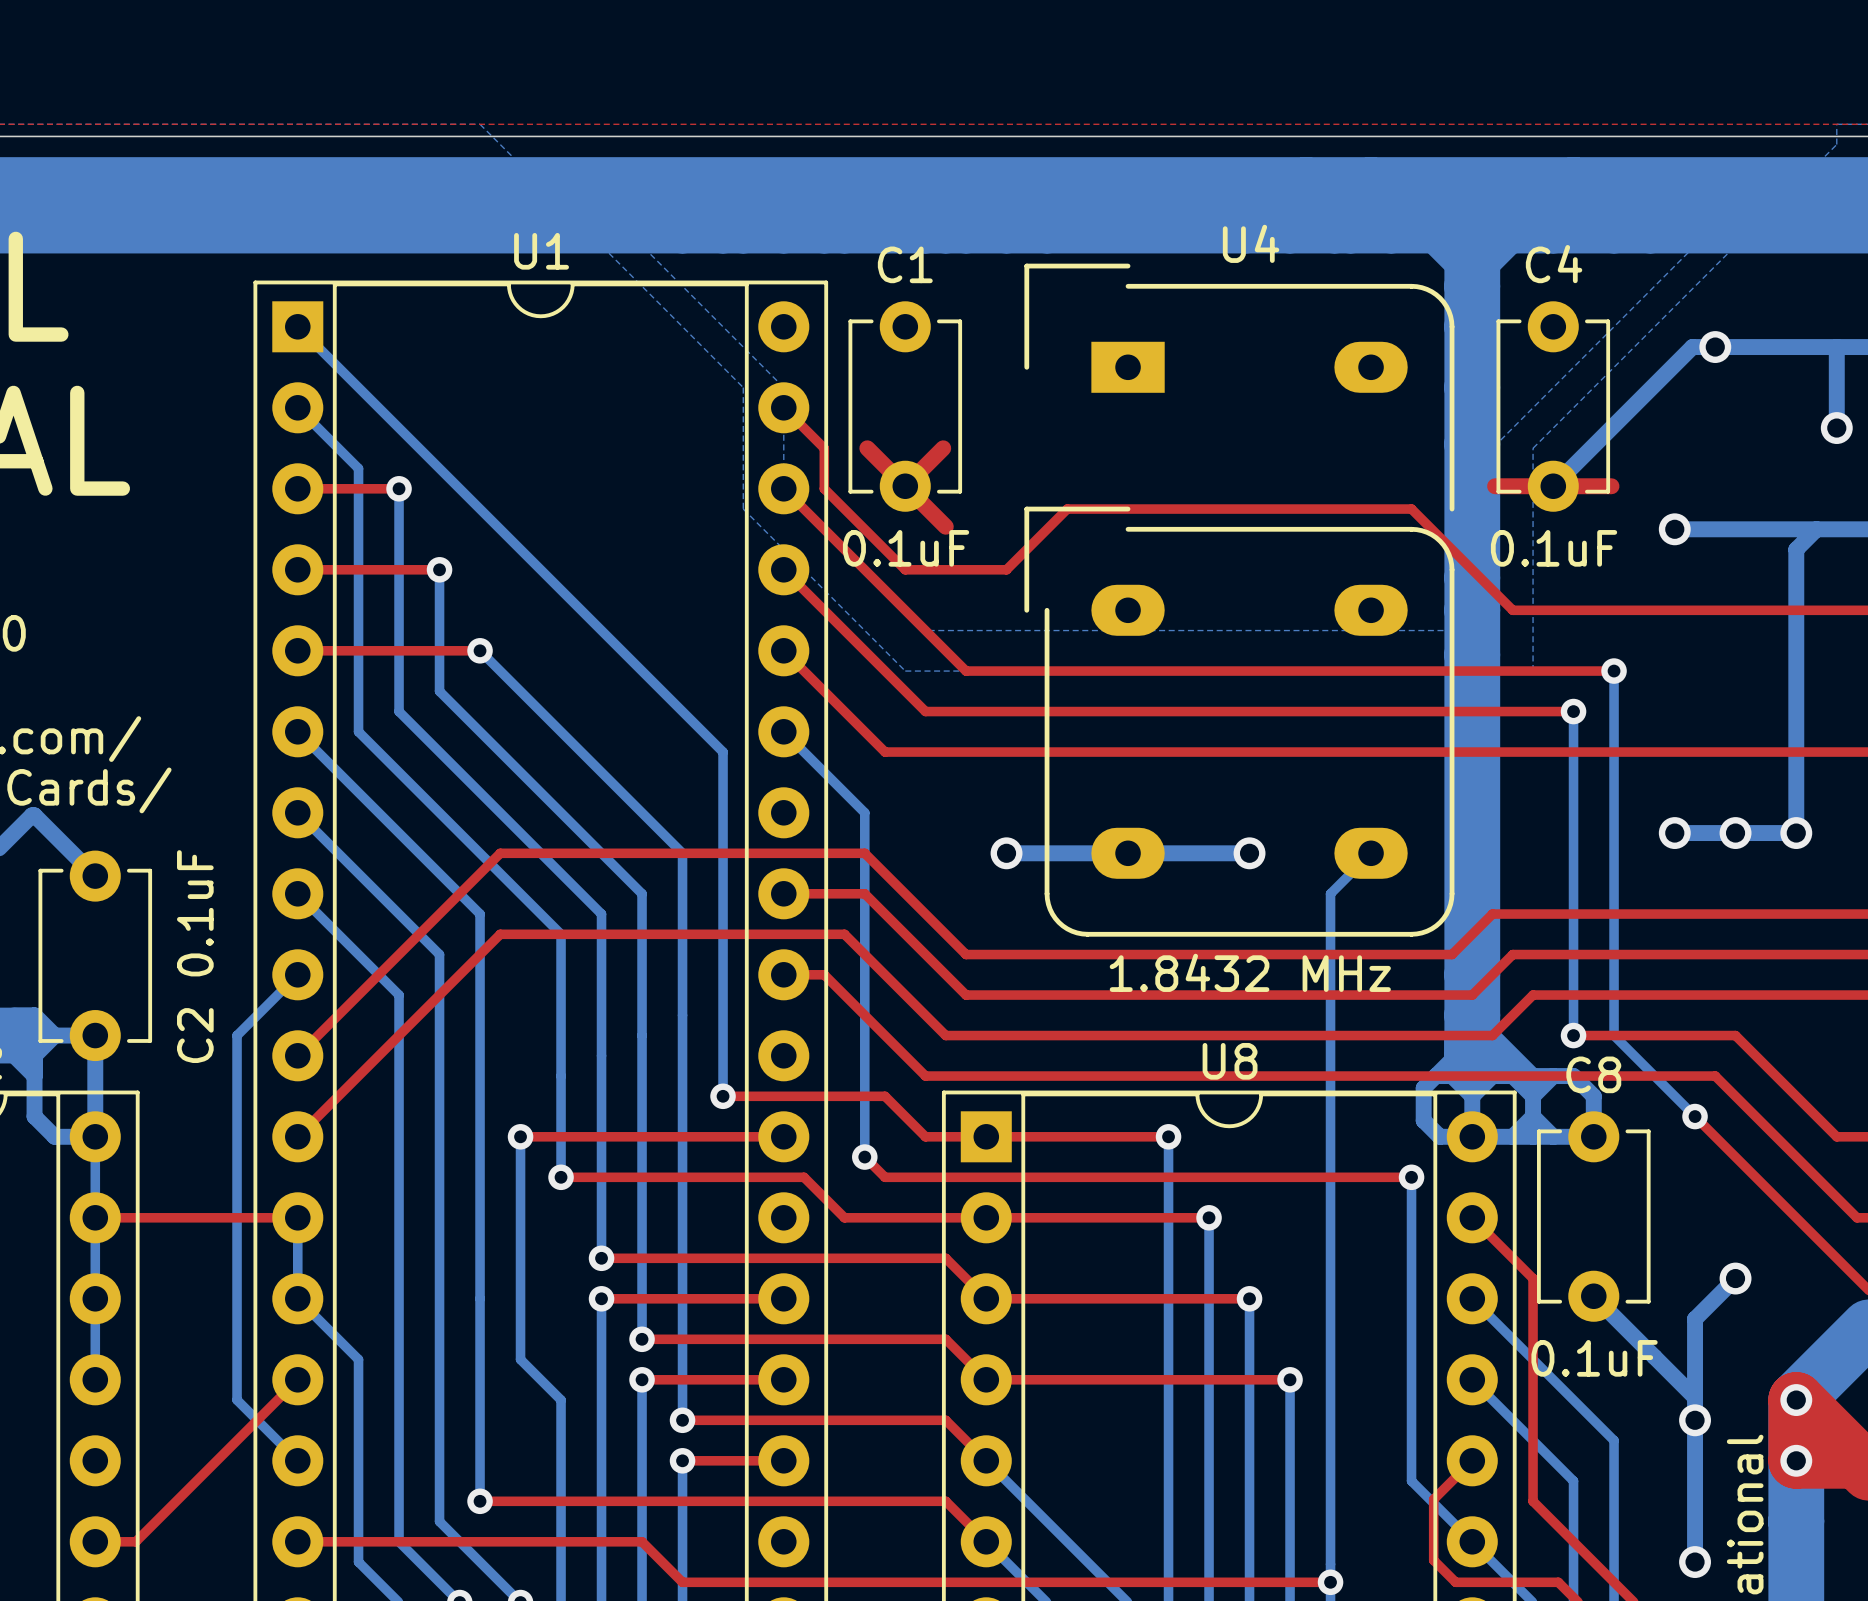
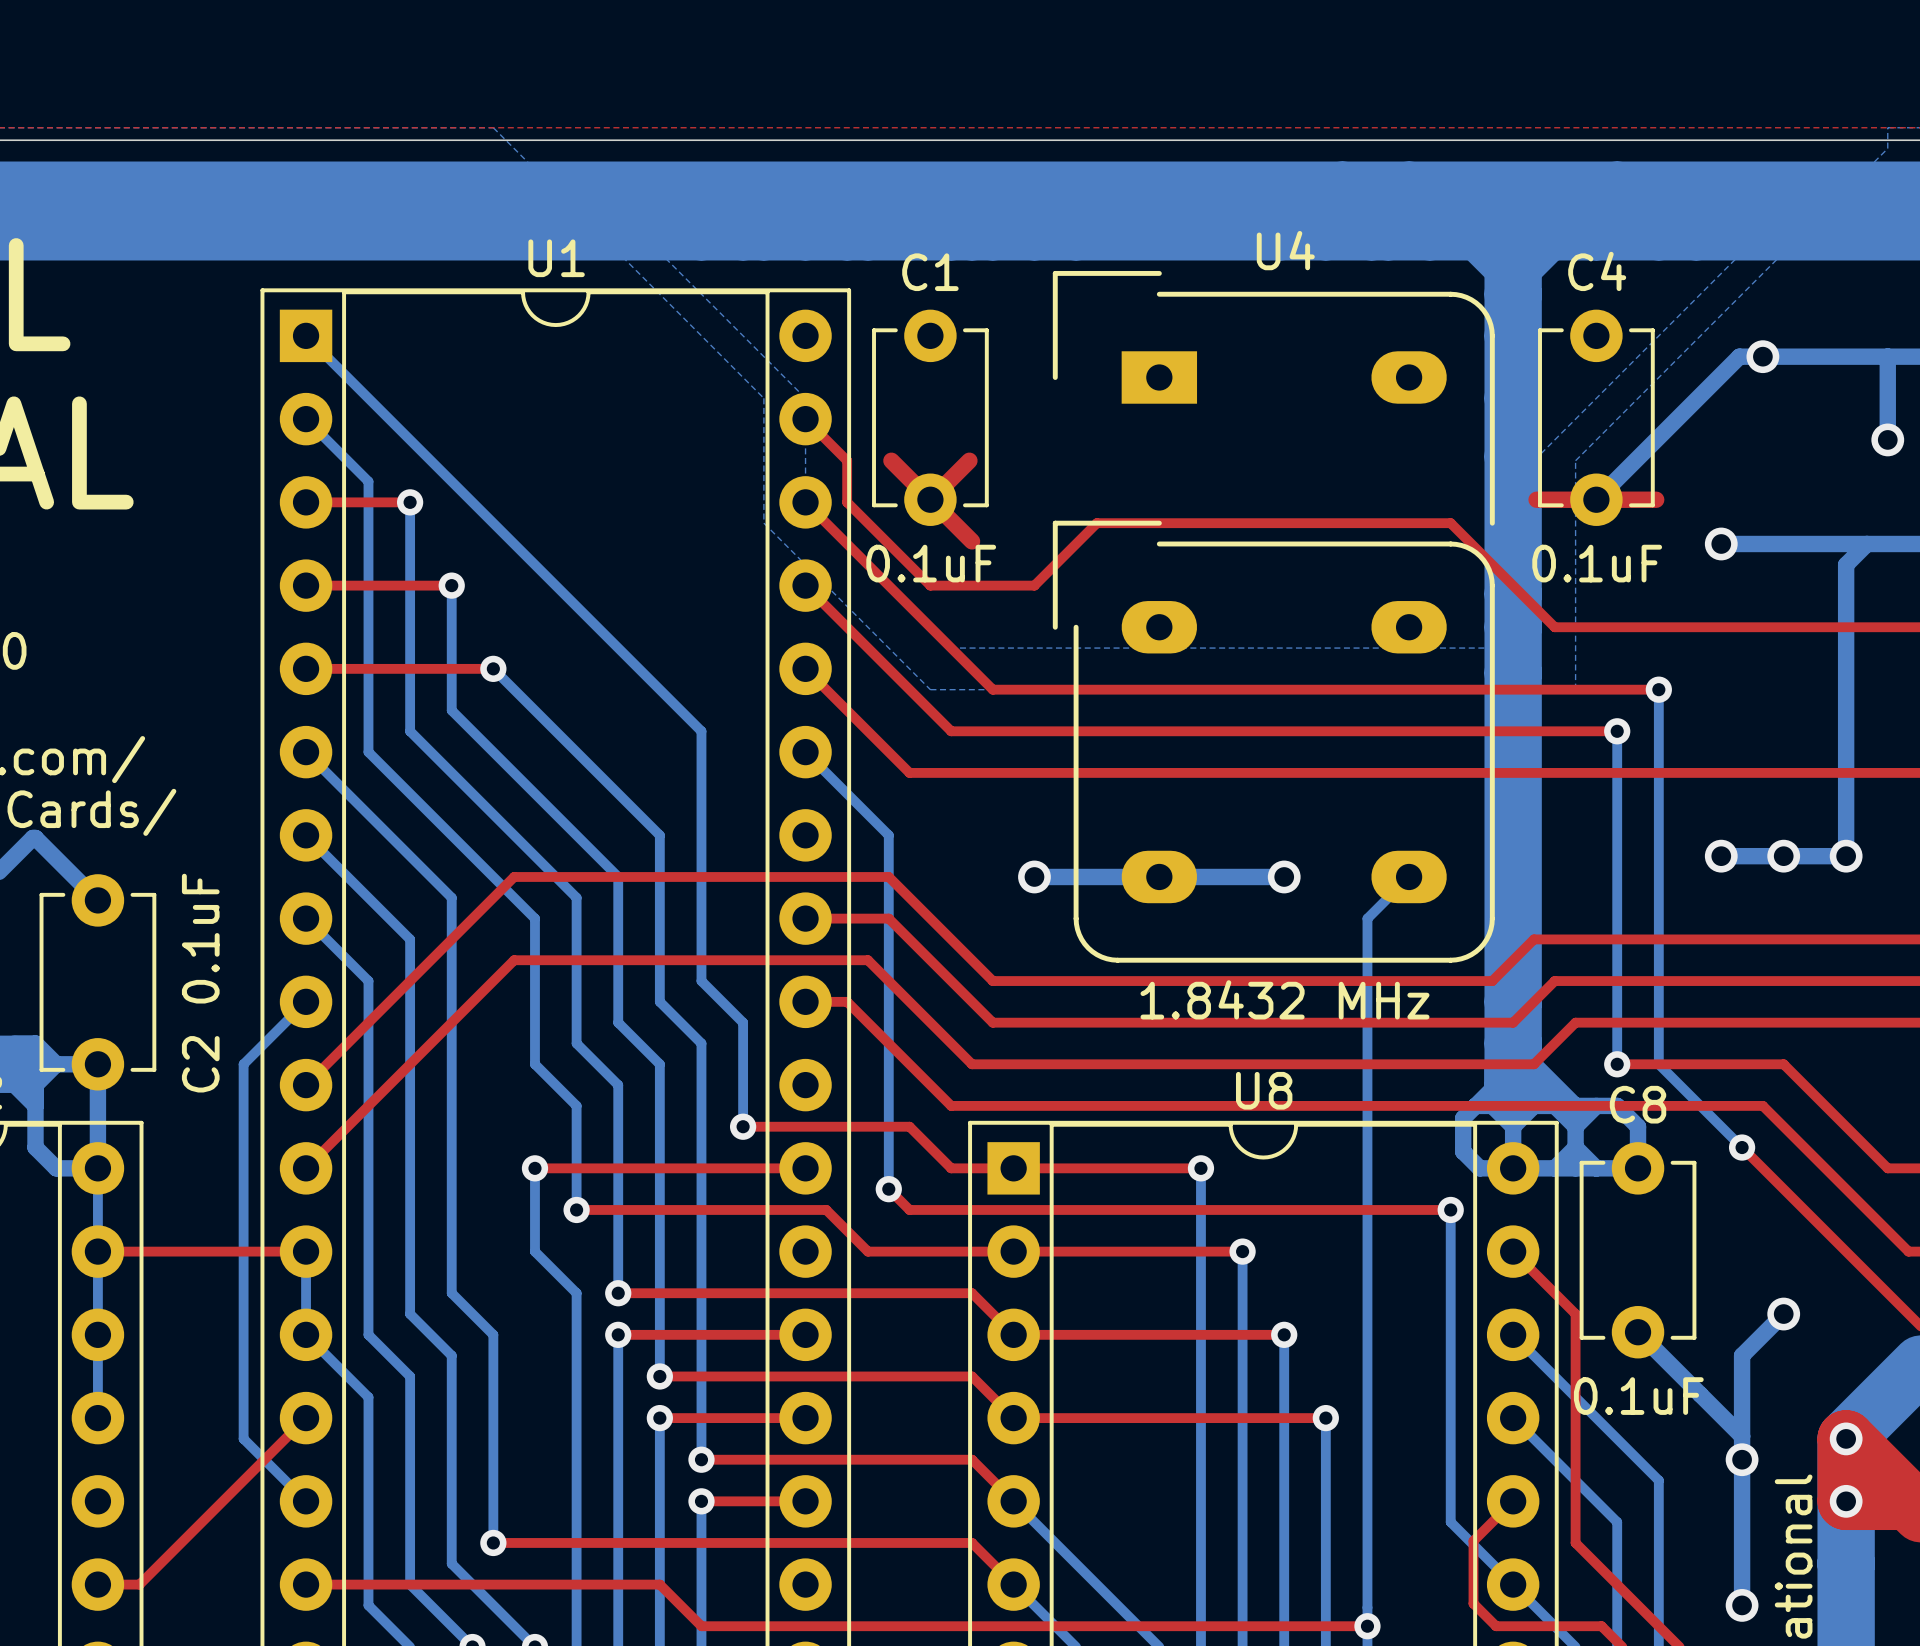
bottom track: (682, 711) (723, 752) (723, 995) -> none
bottom track: (642, 812) (682, 853) -> (701, 731) (701, 876)
bottom track: (601, 853) (642, 893) -> (659, 835) (659, 918)
bottom track: (439, 873) (480, 914) (480, 1298) -> (451, 1293) (493, 1334)
bottom track: (561, 873) (601, 914) -> (618, 876) (618, 939)
bottom track: (520, 893) (561, 934) -> (576, 897) (576, 960)
bottom track: (399, 914) (439, 954) -> (451, 897) (451, 981)
bottom track: (358, 954) (399, 995) -> (410, 939) (410, 1022)
bottom track: (682, 954) (682, 1015) -> (701, 981) (743, 1022)
bottom track: (642, 974) (642, 1035) -> (659, 1001) (701, 1043)
bottom track: (601, 995) (601, 1055) -> (576, 1043) (618, 1085)
bottom track: none -> (618, 1022) (659, 1064)
bottom track: (561, 1015) (561, 1076) -> (534, 918) (534, 1064) (576, 1105)
bottom track: (520, 1217) (520, 1359) (561, 1400) -> (534, 1251) (576, 1293) (576, 1438)
bottom track: (439, 1258) (439, 1319) -> (410, 1314) (451, 1355)
bottom track: (399, 1278) (399, 1339) -> (368, 981) (368, 1334) (410, 1376)

